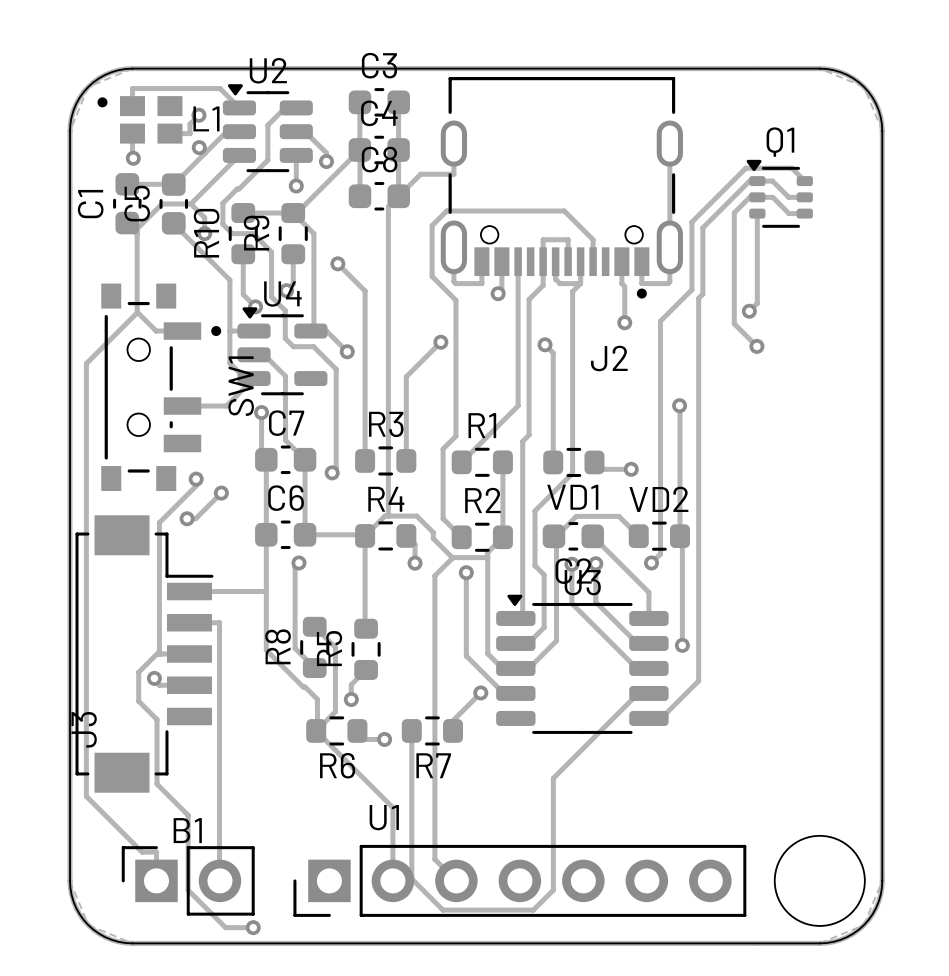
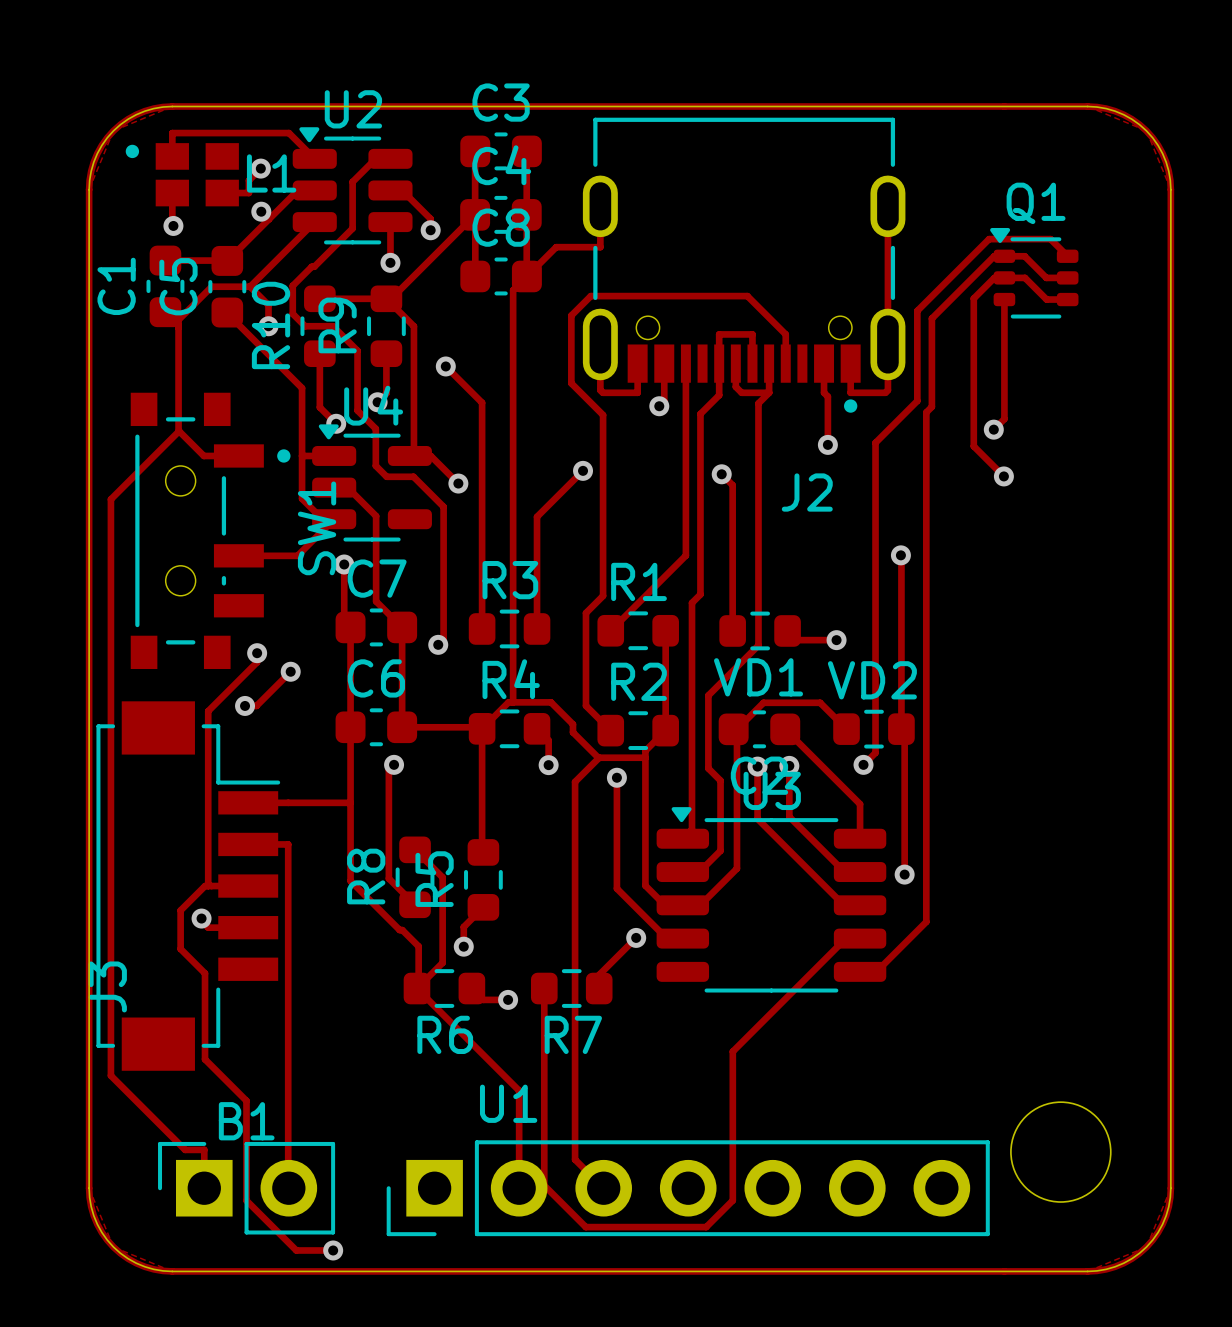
round board edge: none -> [1010, 1101, 1112, 1203]
round board edge: [774, 835, 866, 927] -> none

